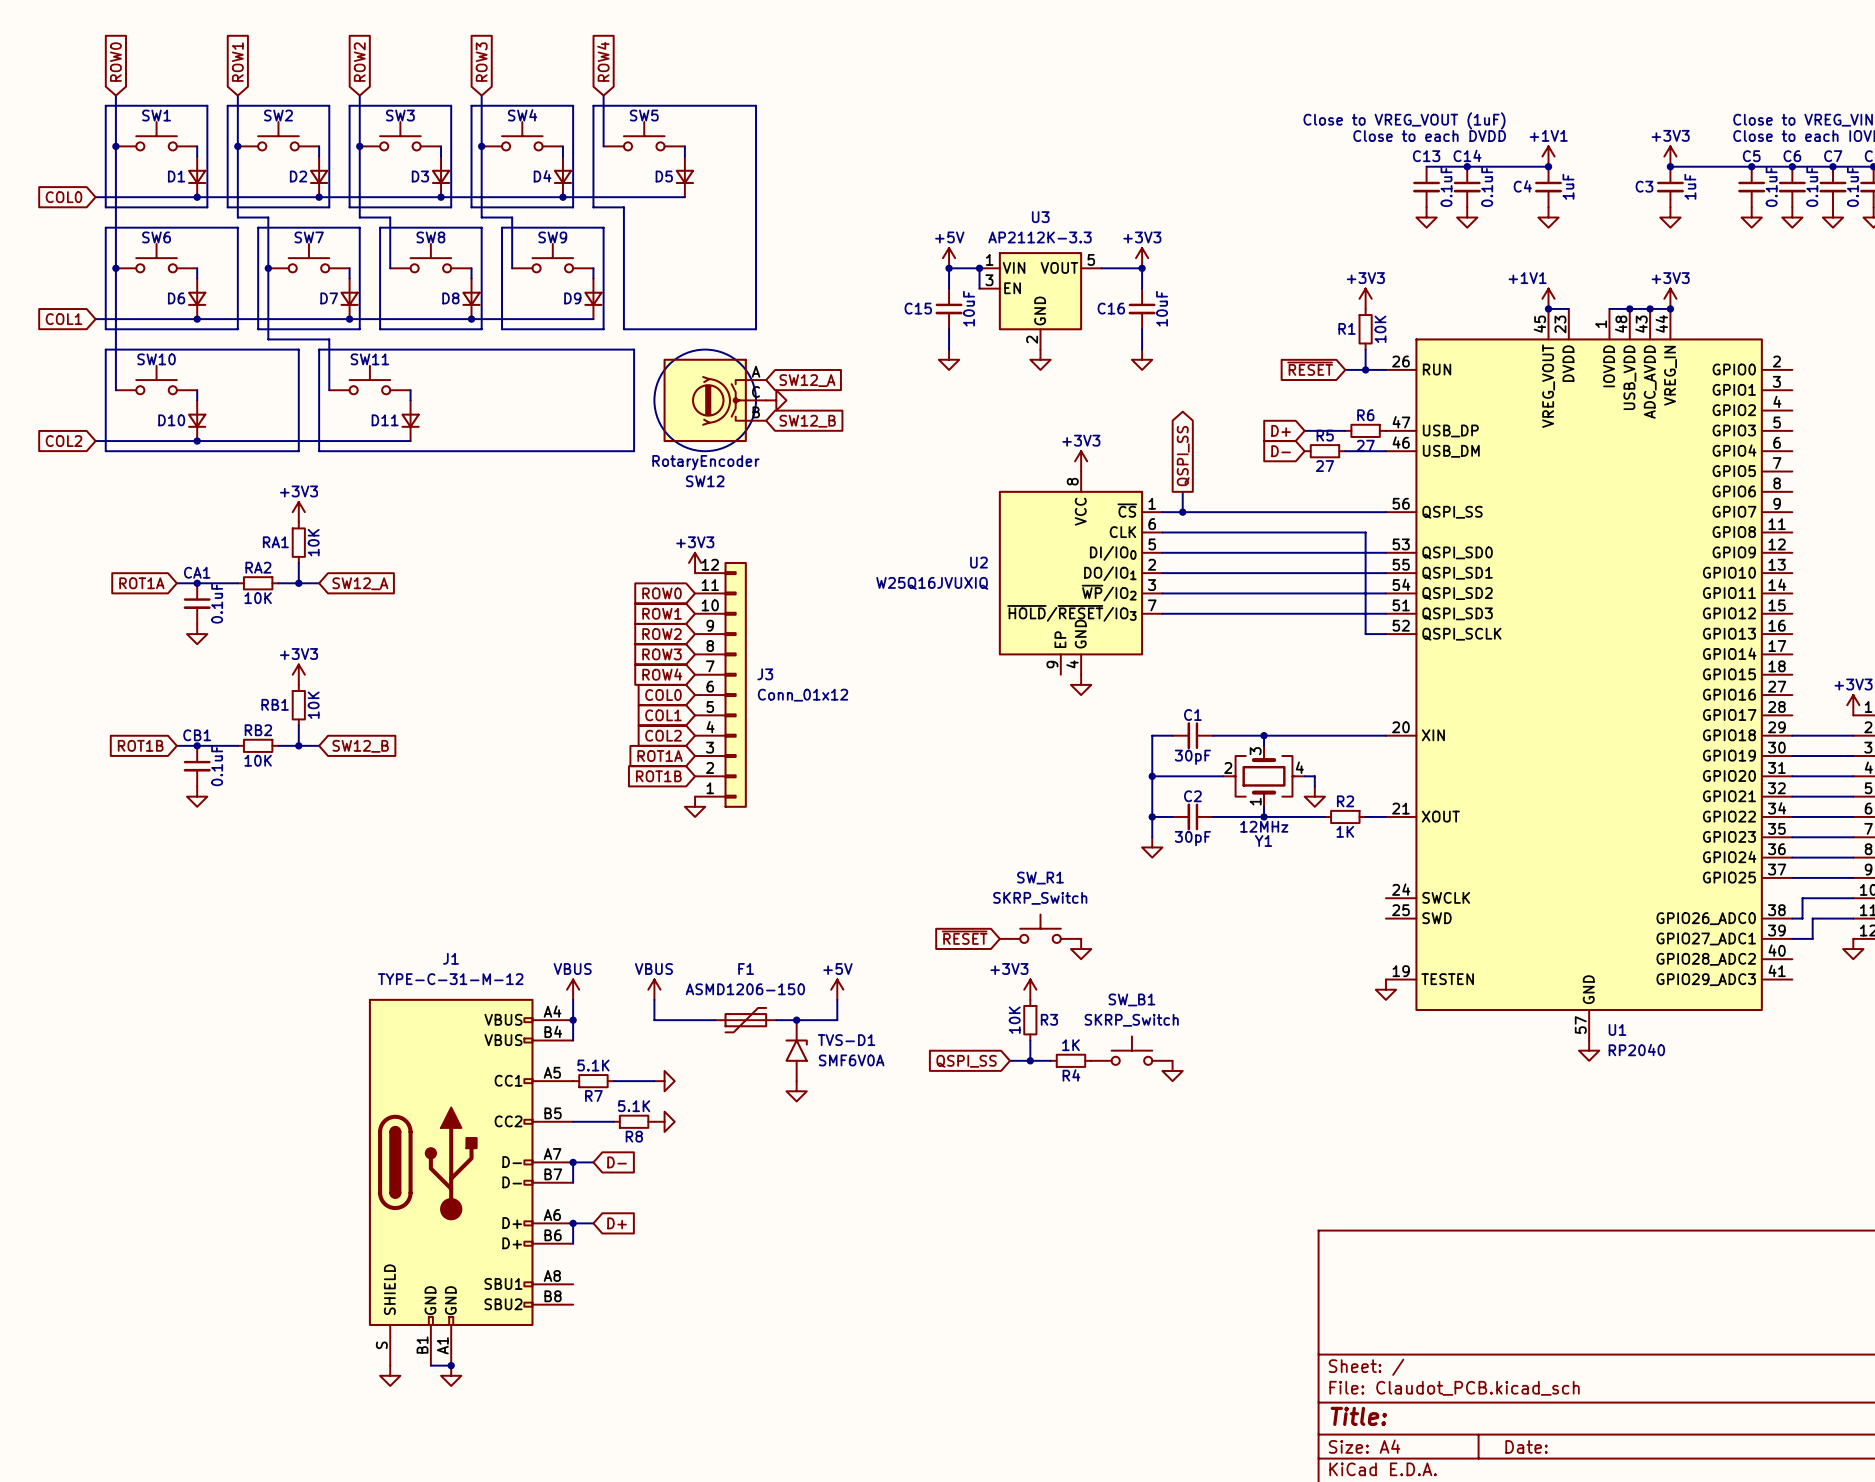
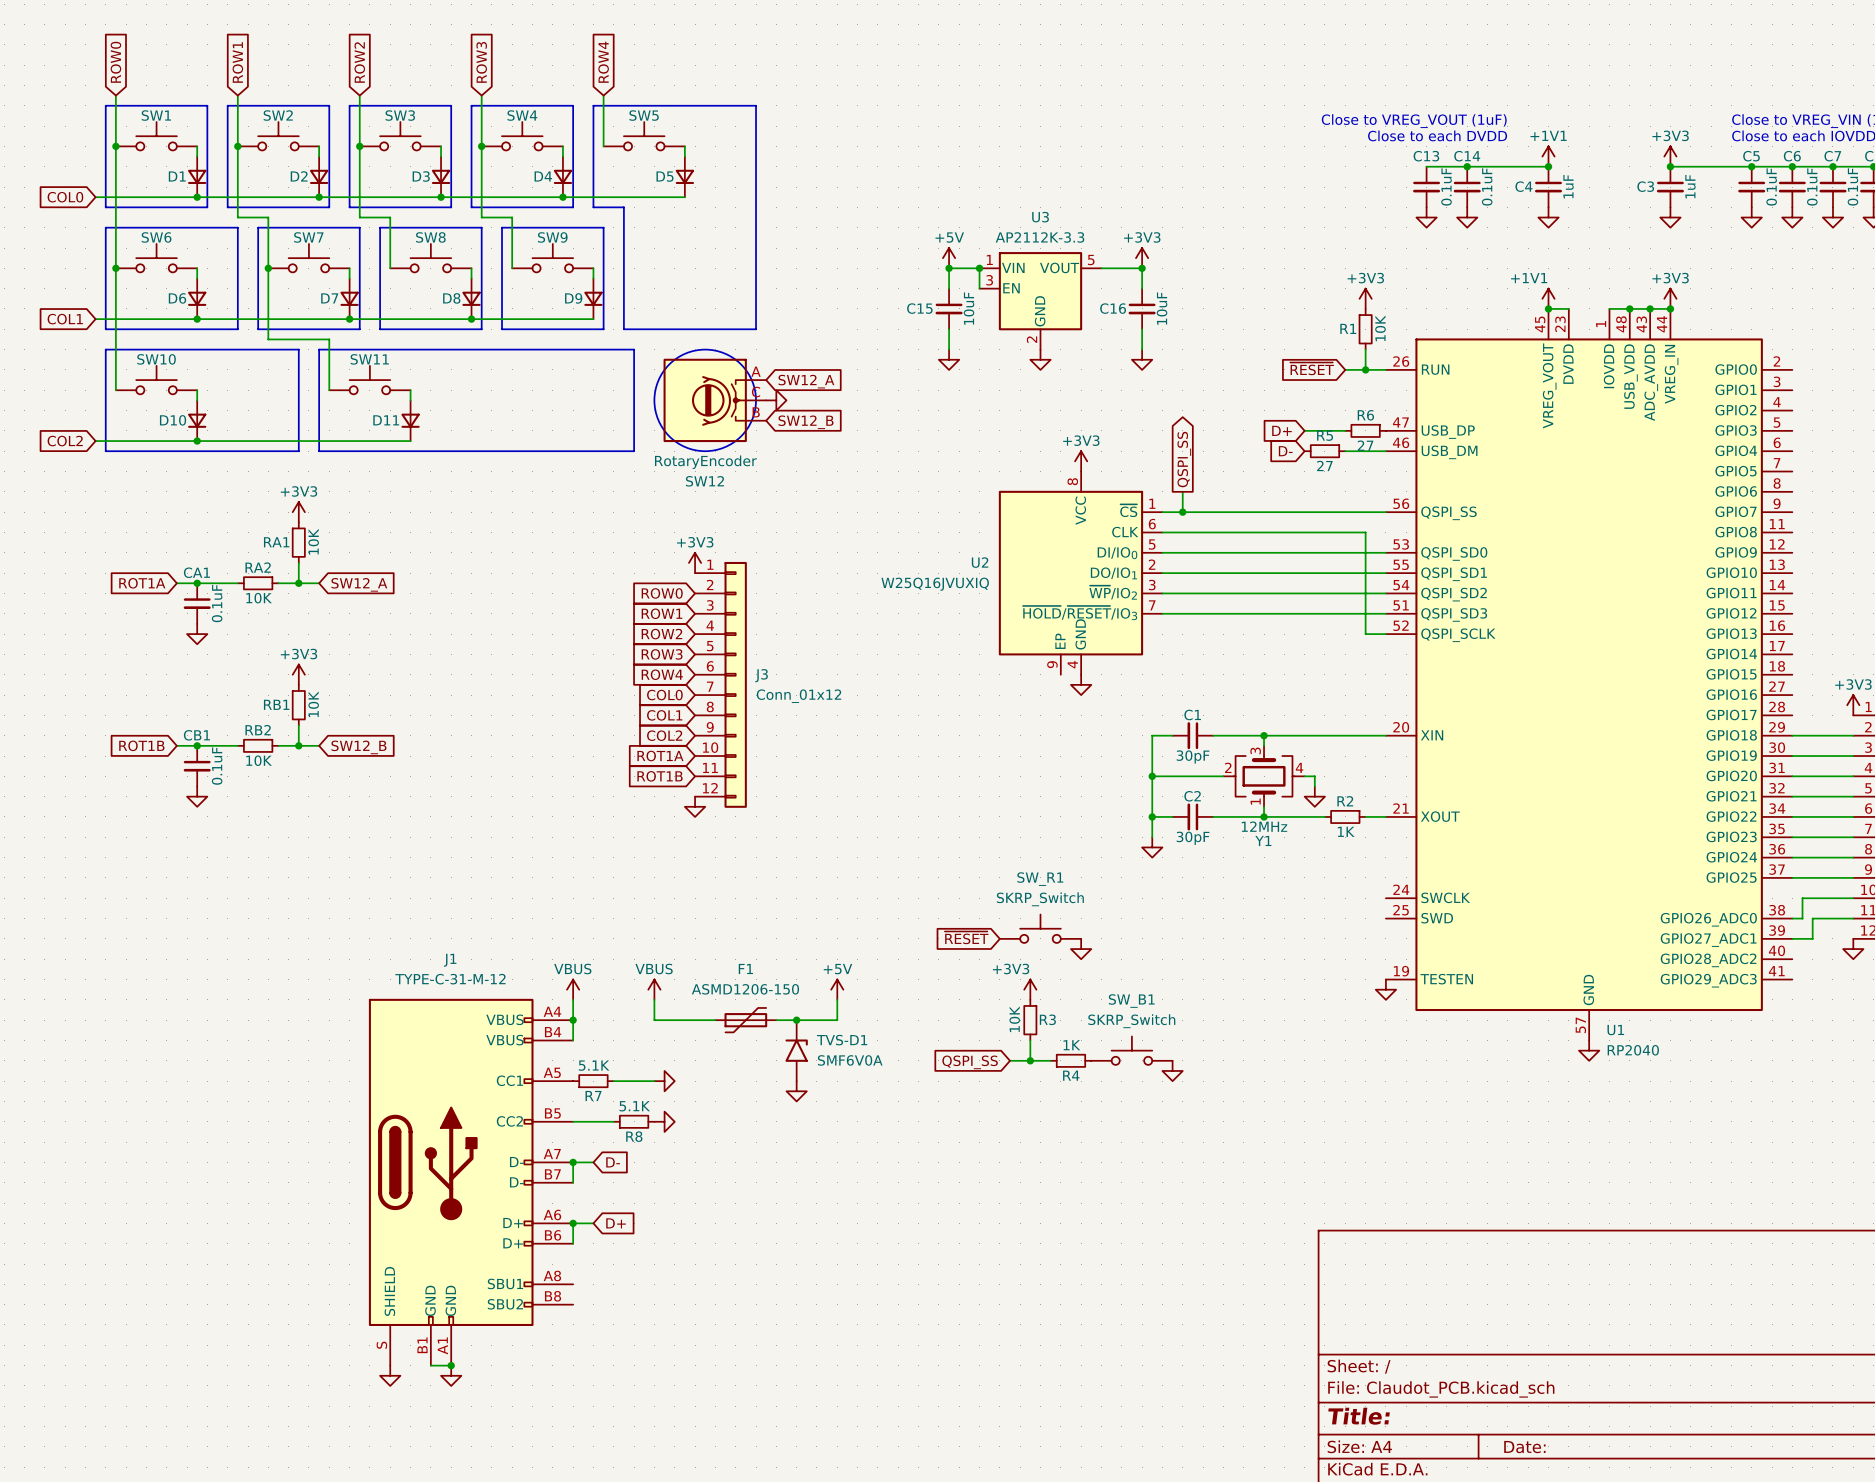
J3 flip: as is (735, 684) -> up-down (735, 684)

